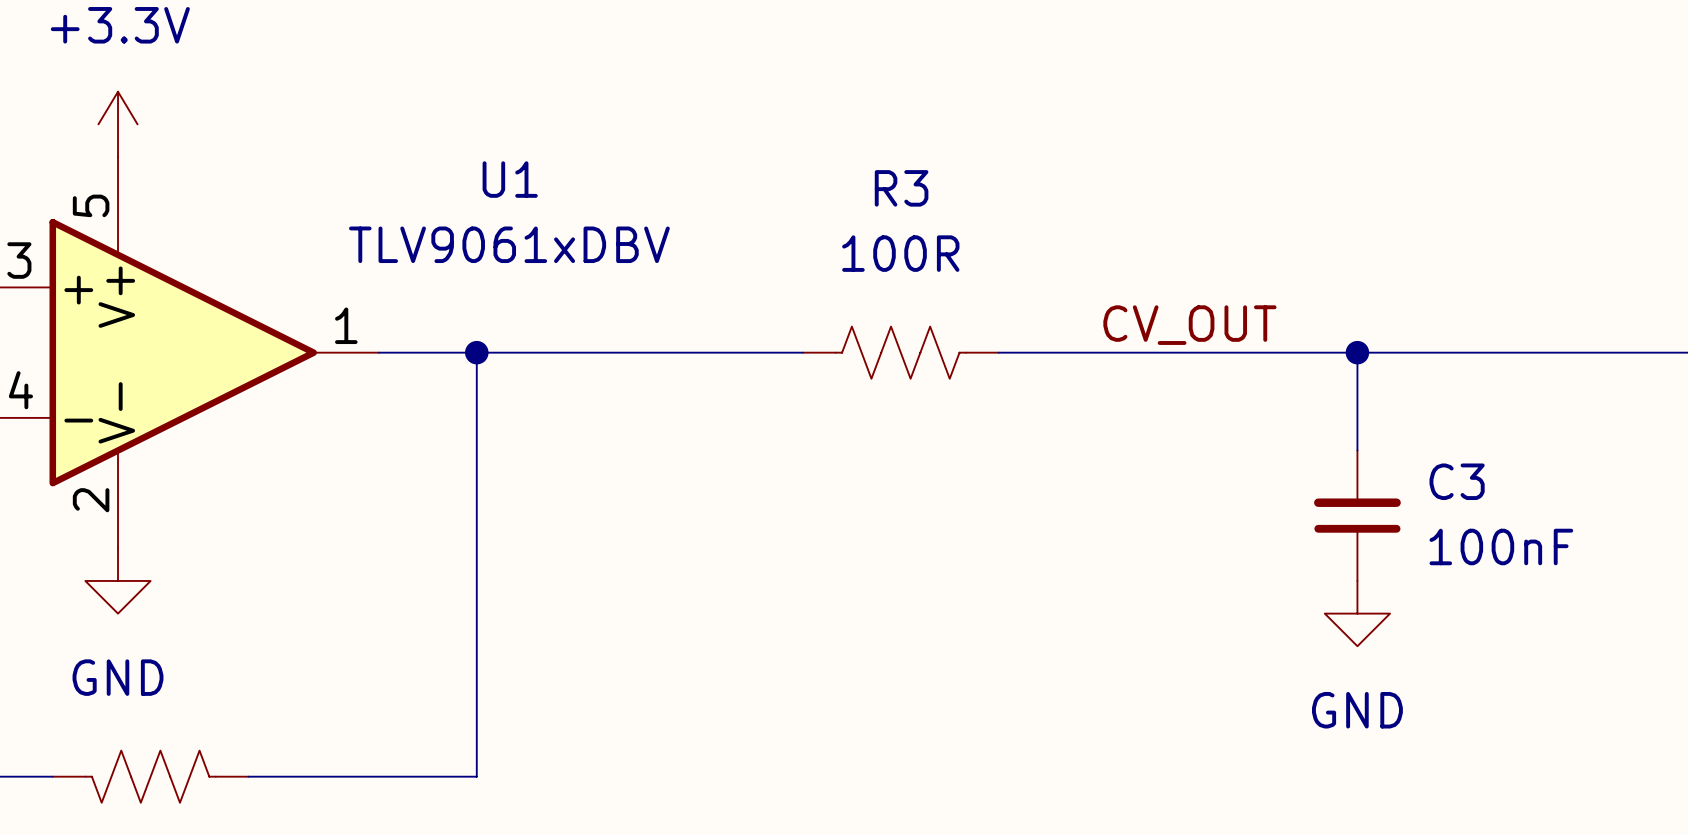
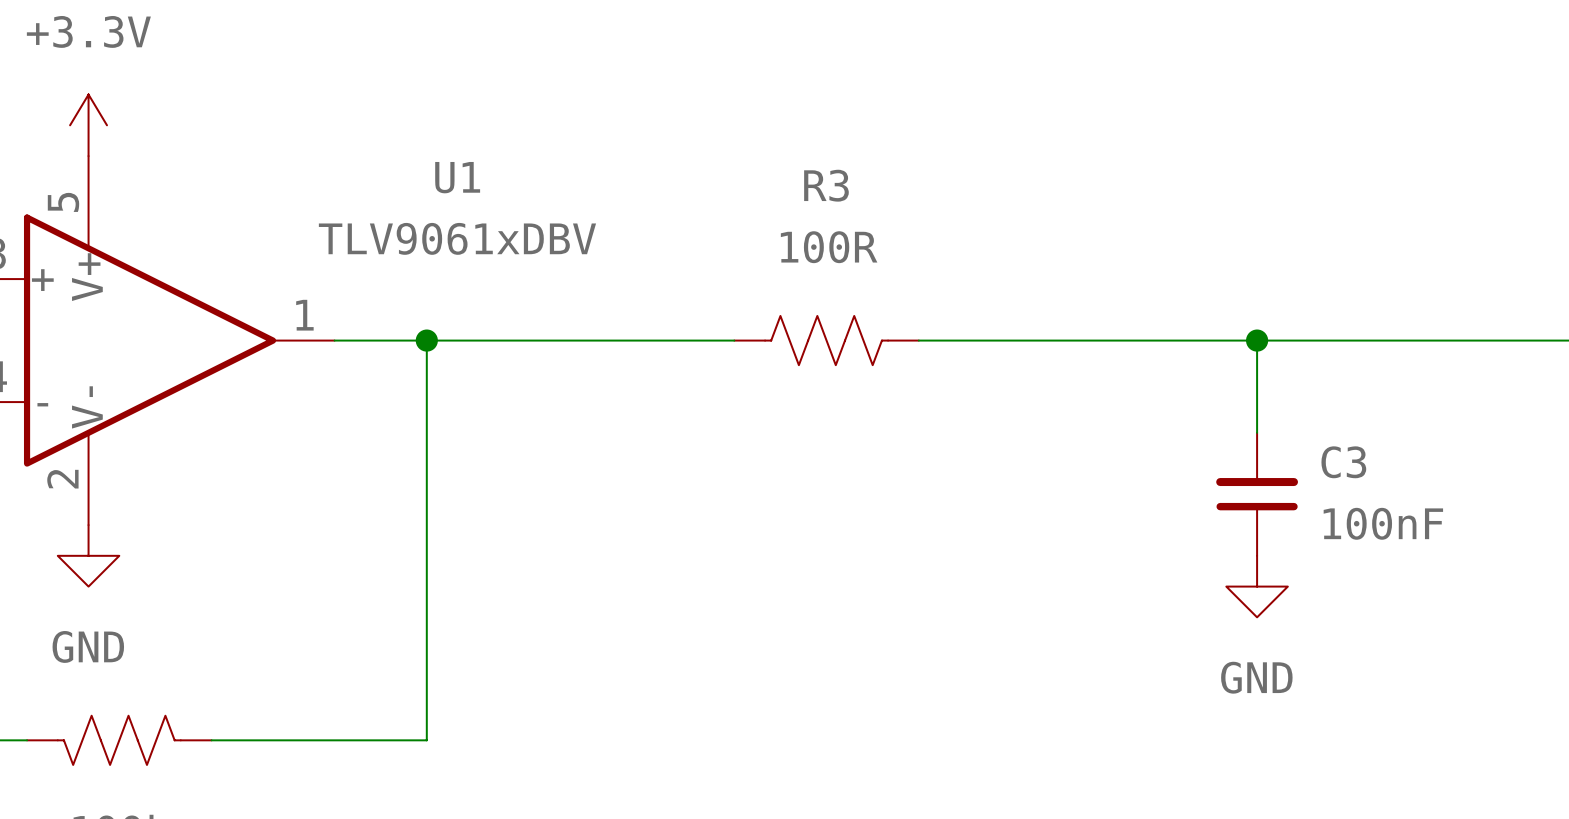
label: CV_OUT (1189, 325) -> none

